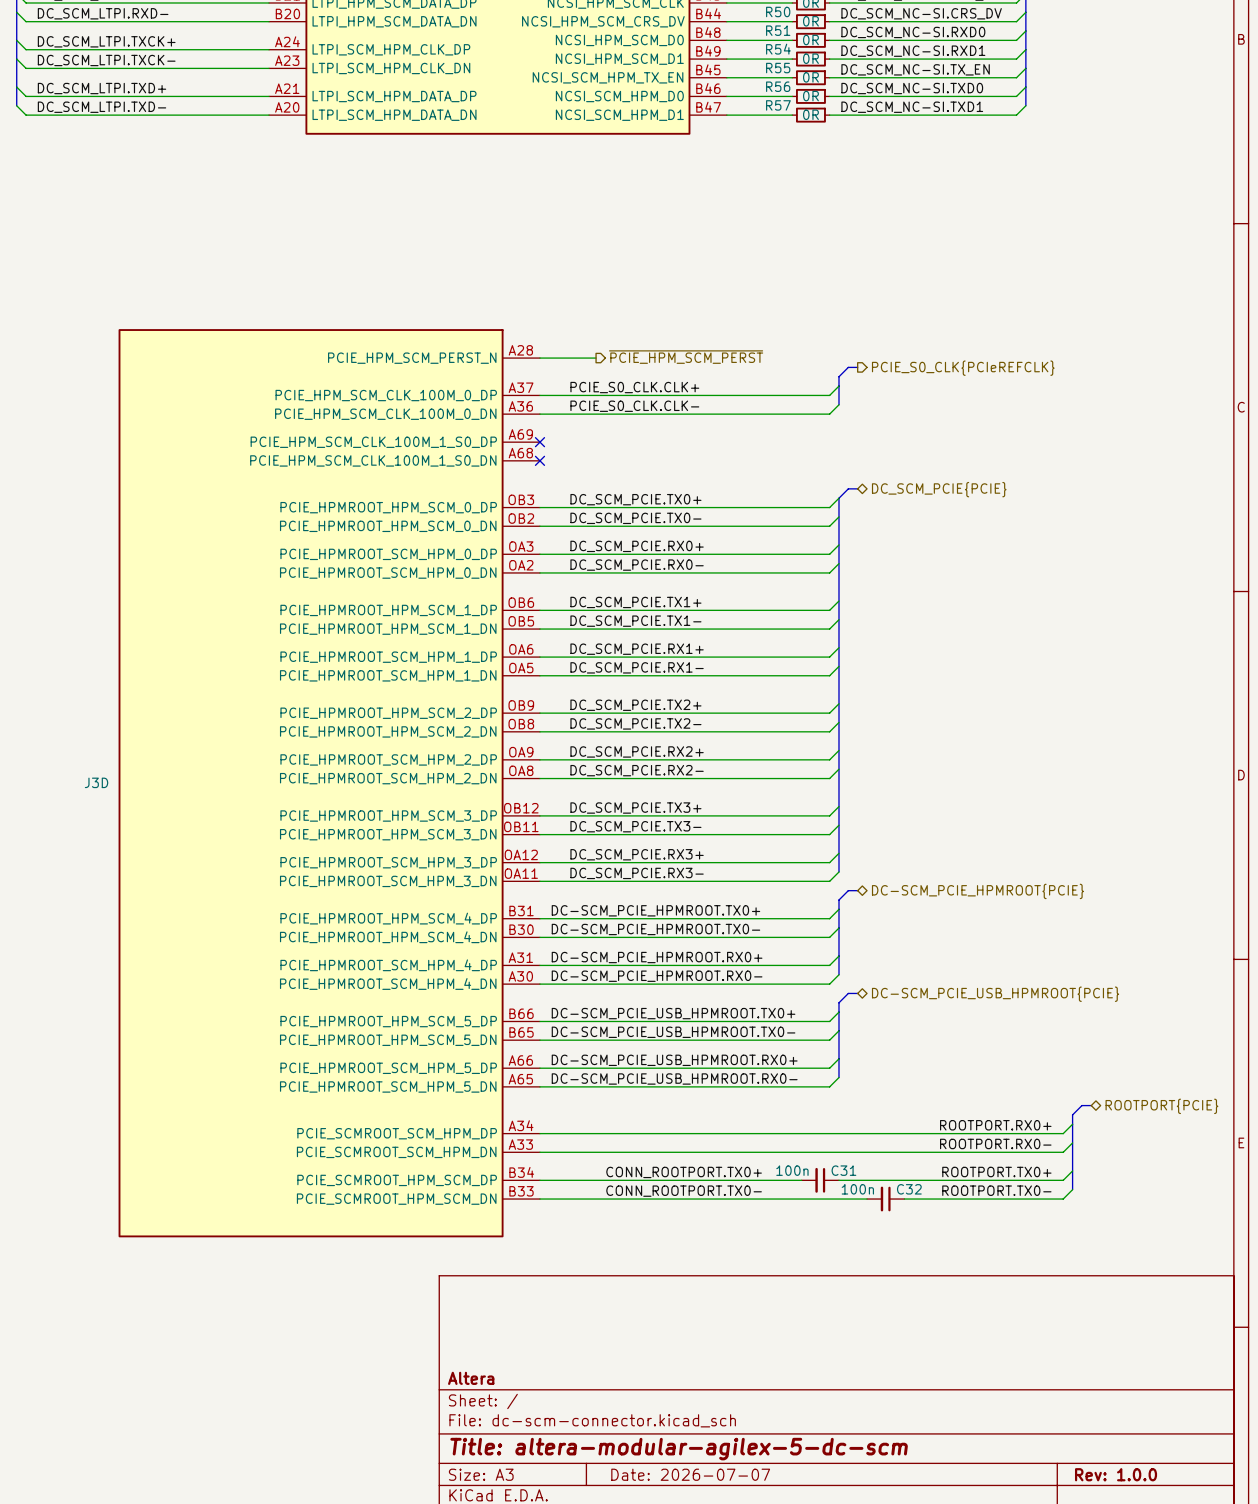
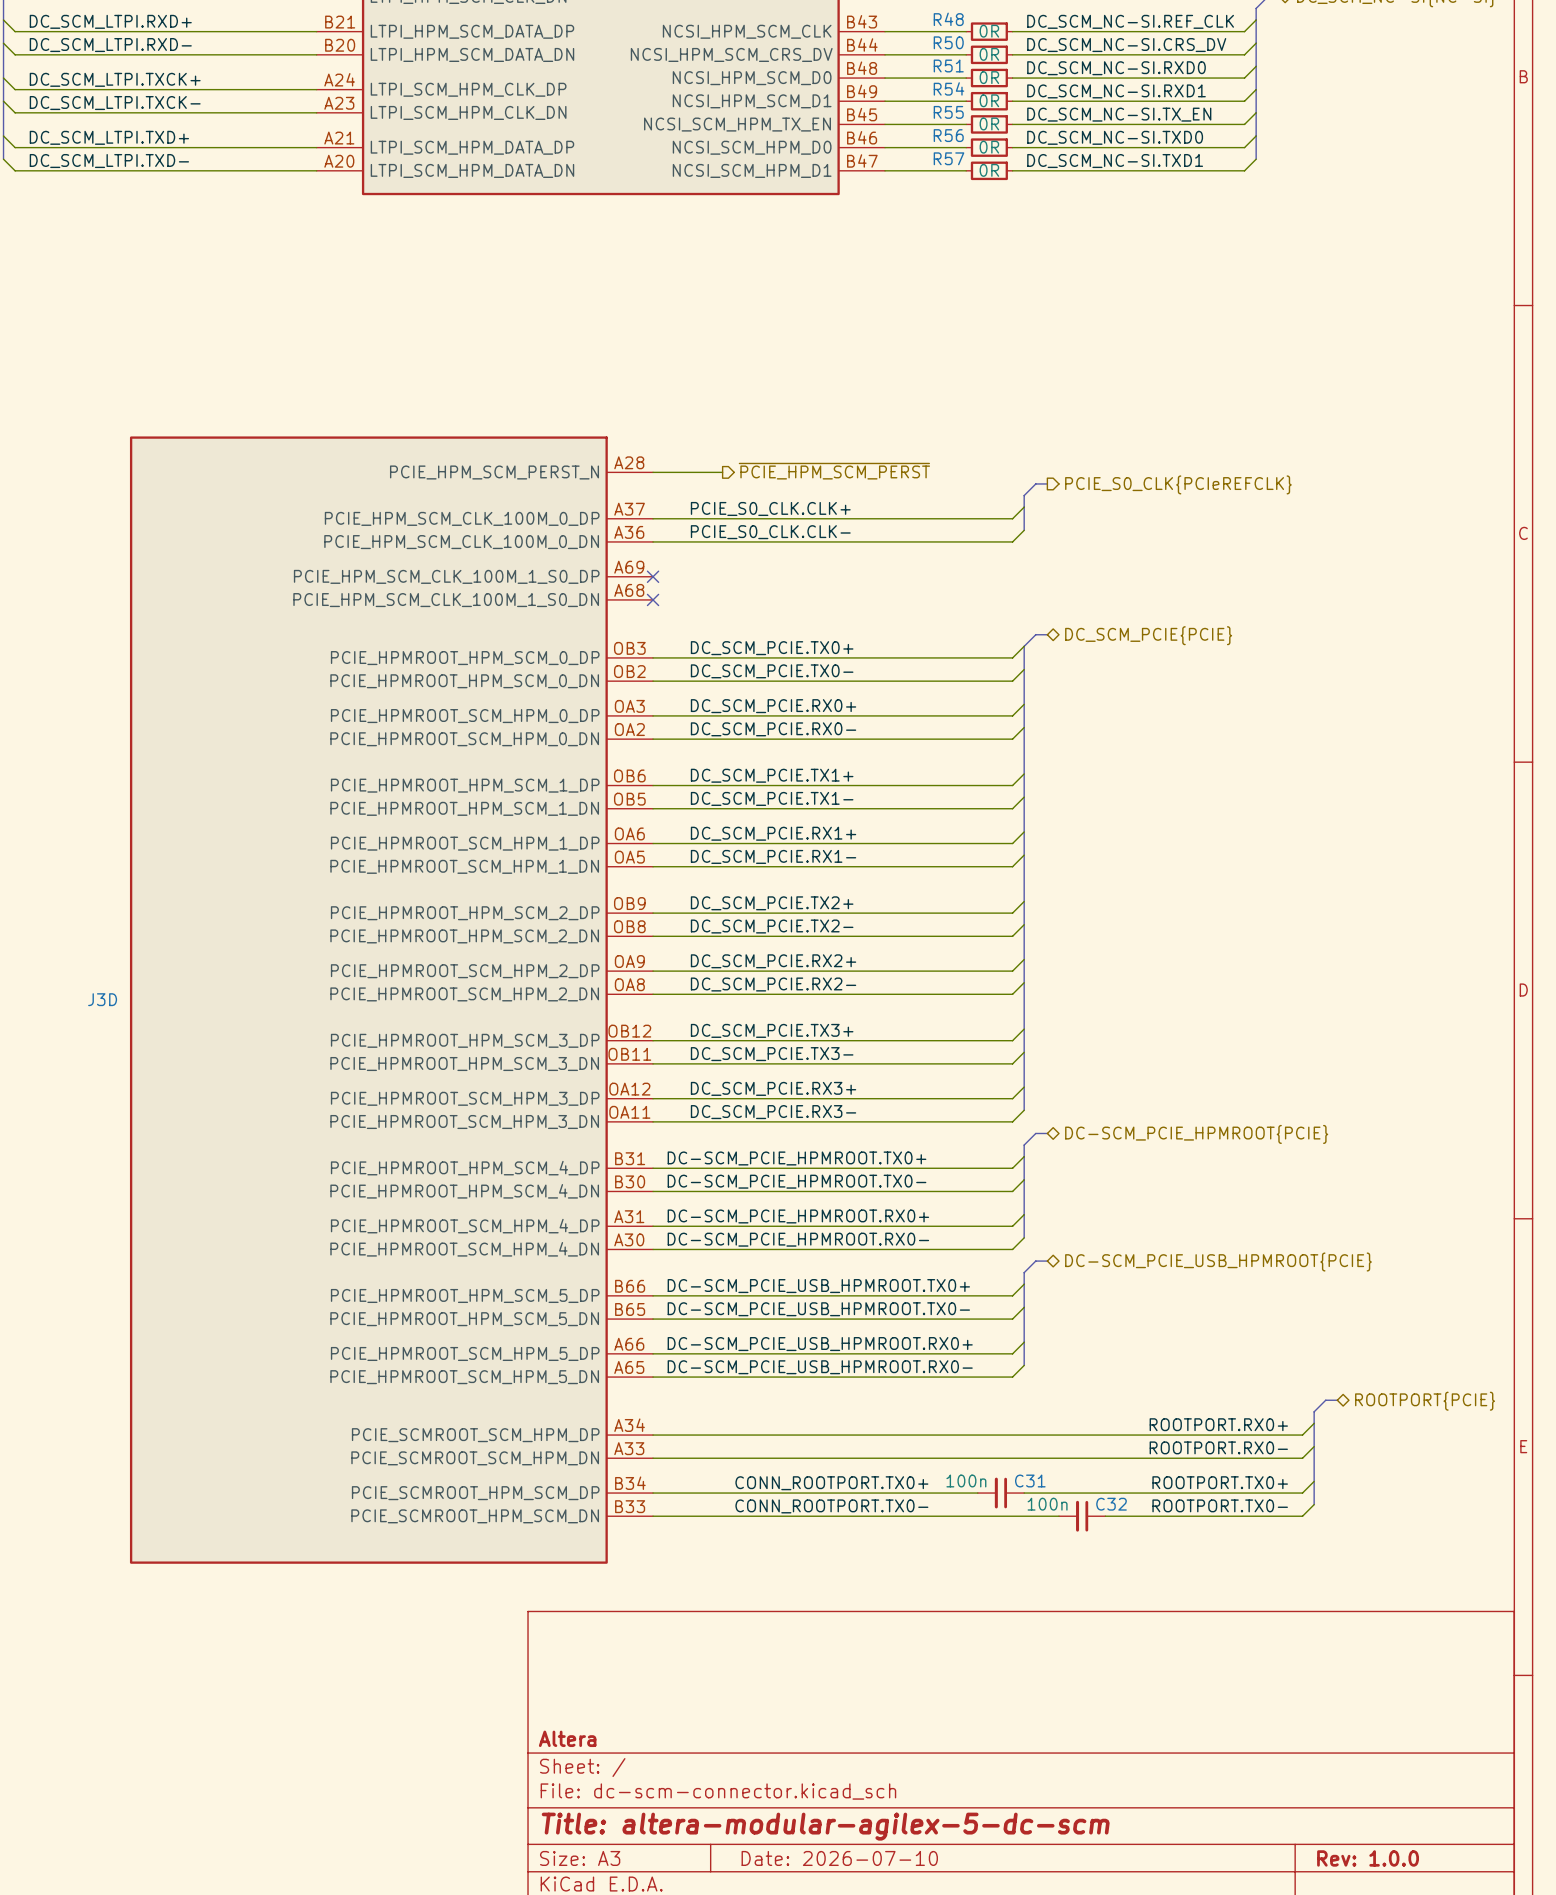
title block: Date: 2026-07-07 (690, 1474) -> Date: 2026-07-10 (839, 1858)

